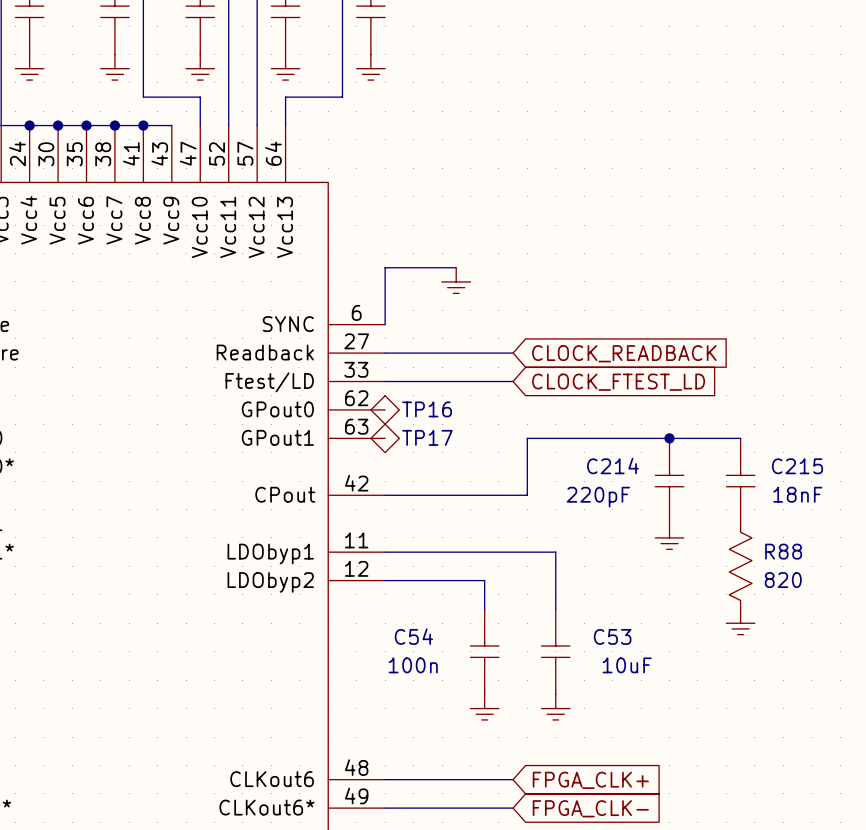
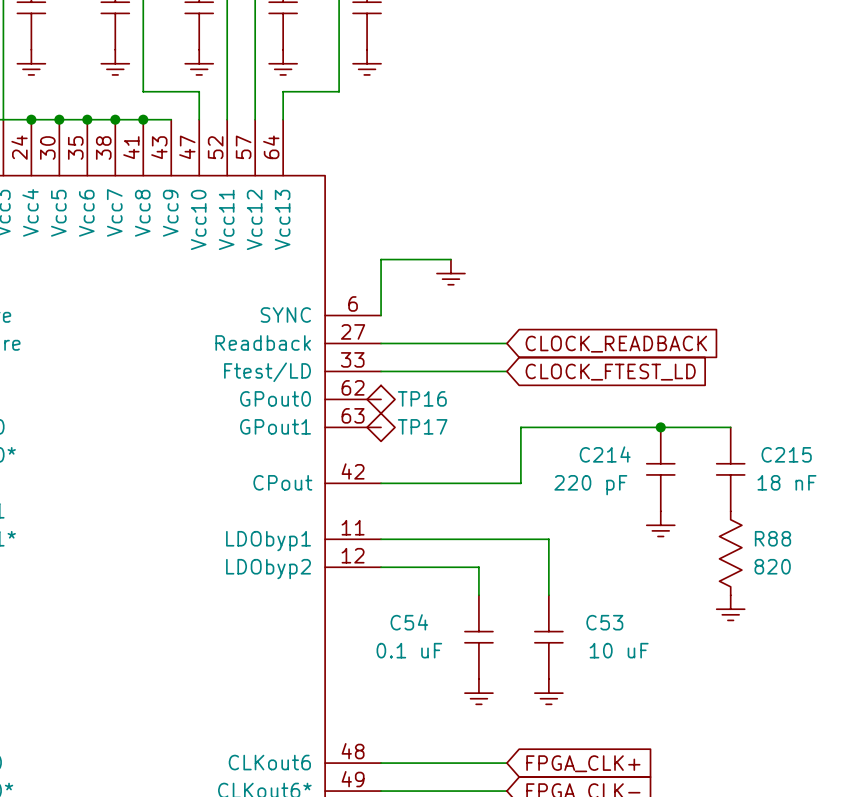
C215 value: 18nF (797, 494) -> 18 nF (786, 482)
C214 value: 220pF (598, 497) -> 220 pF (590, 485)
C54 value: 100n (413, 665) -> 0.1 uF (409, 650)
C53 value: 10uF (627, 665) -> 10 uF (619, 650)

